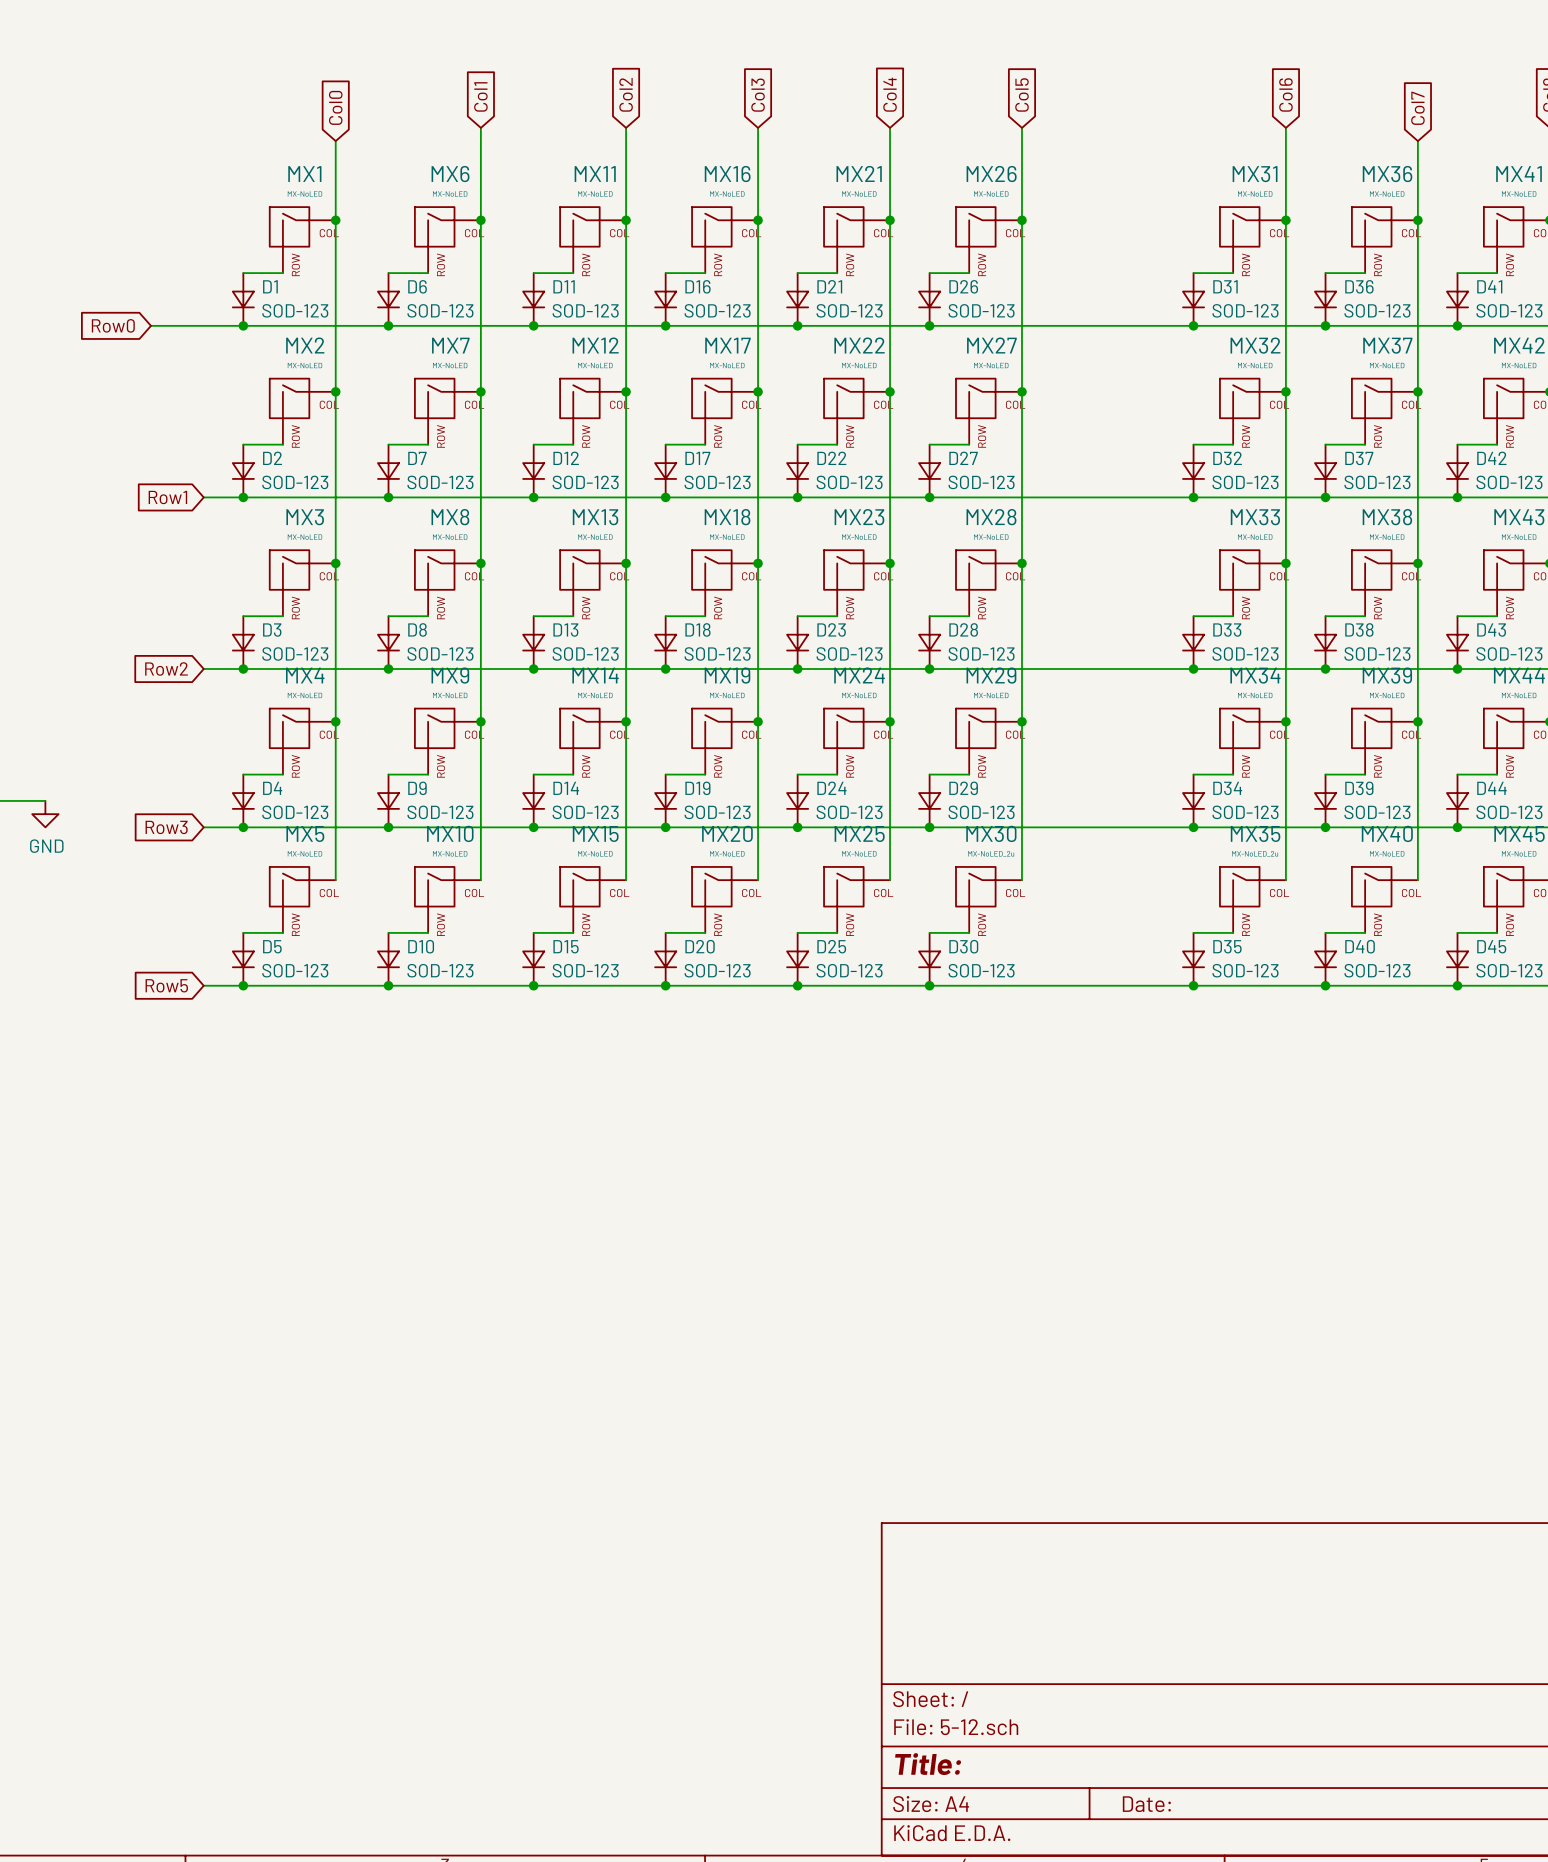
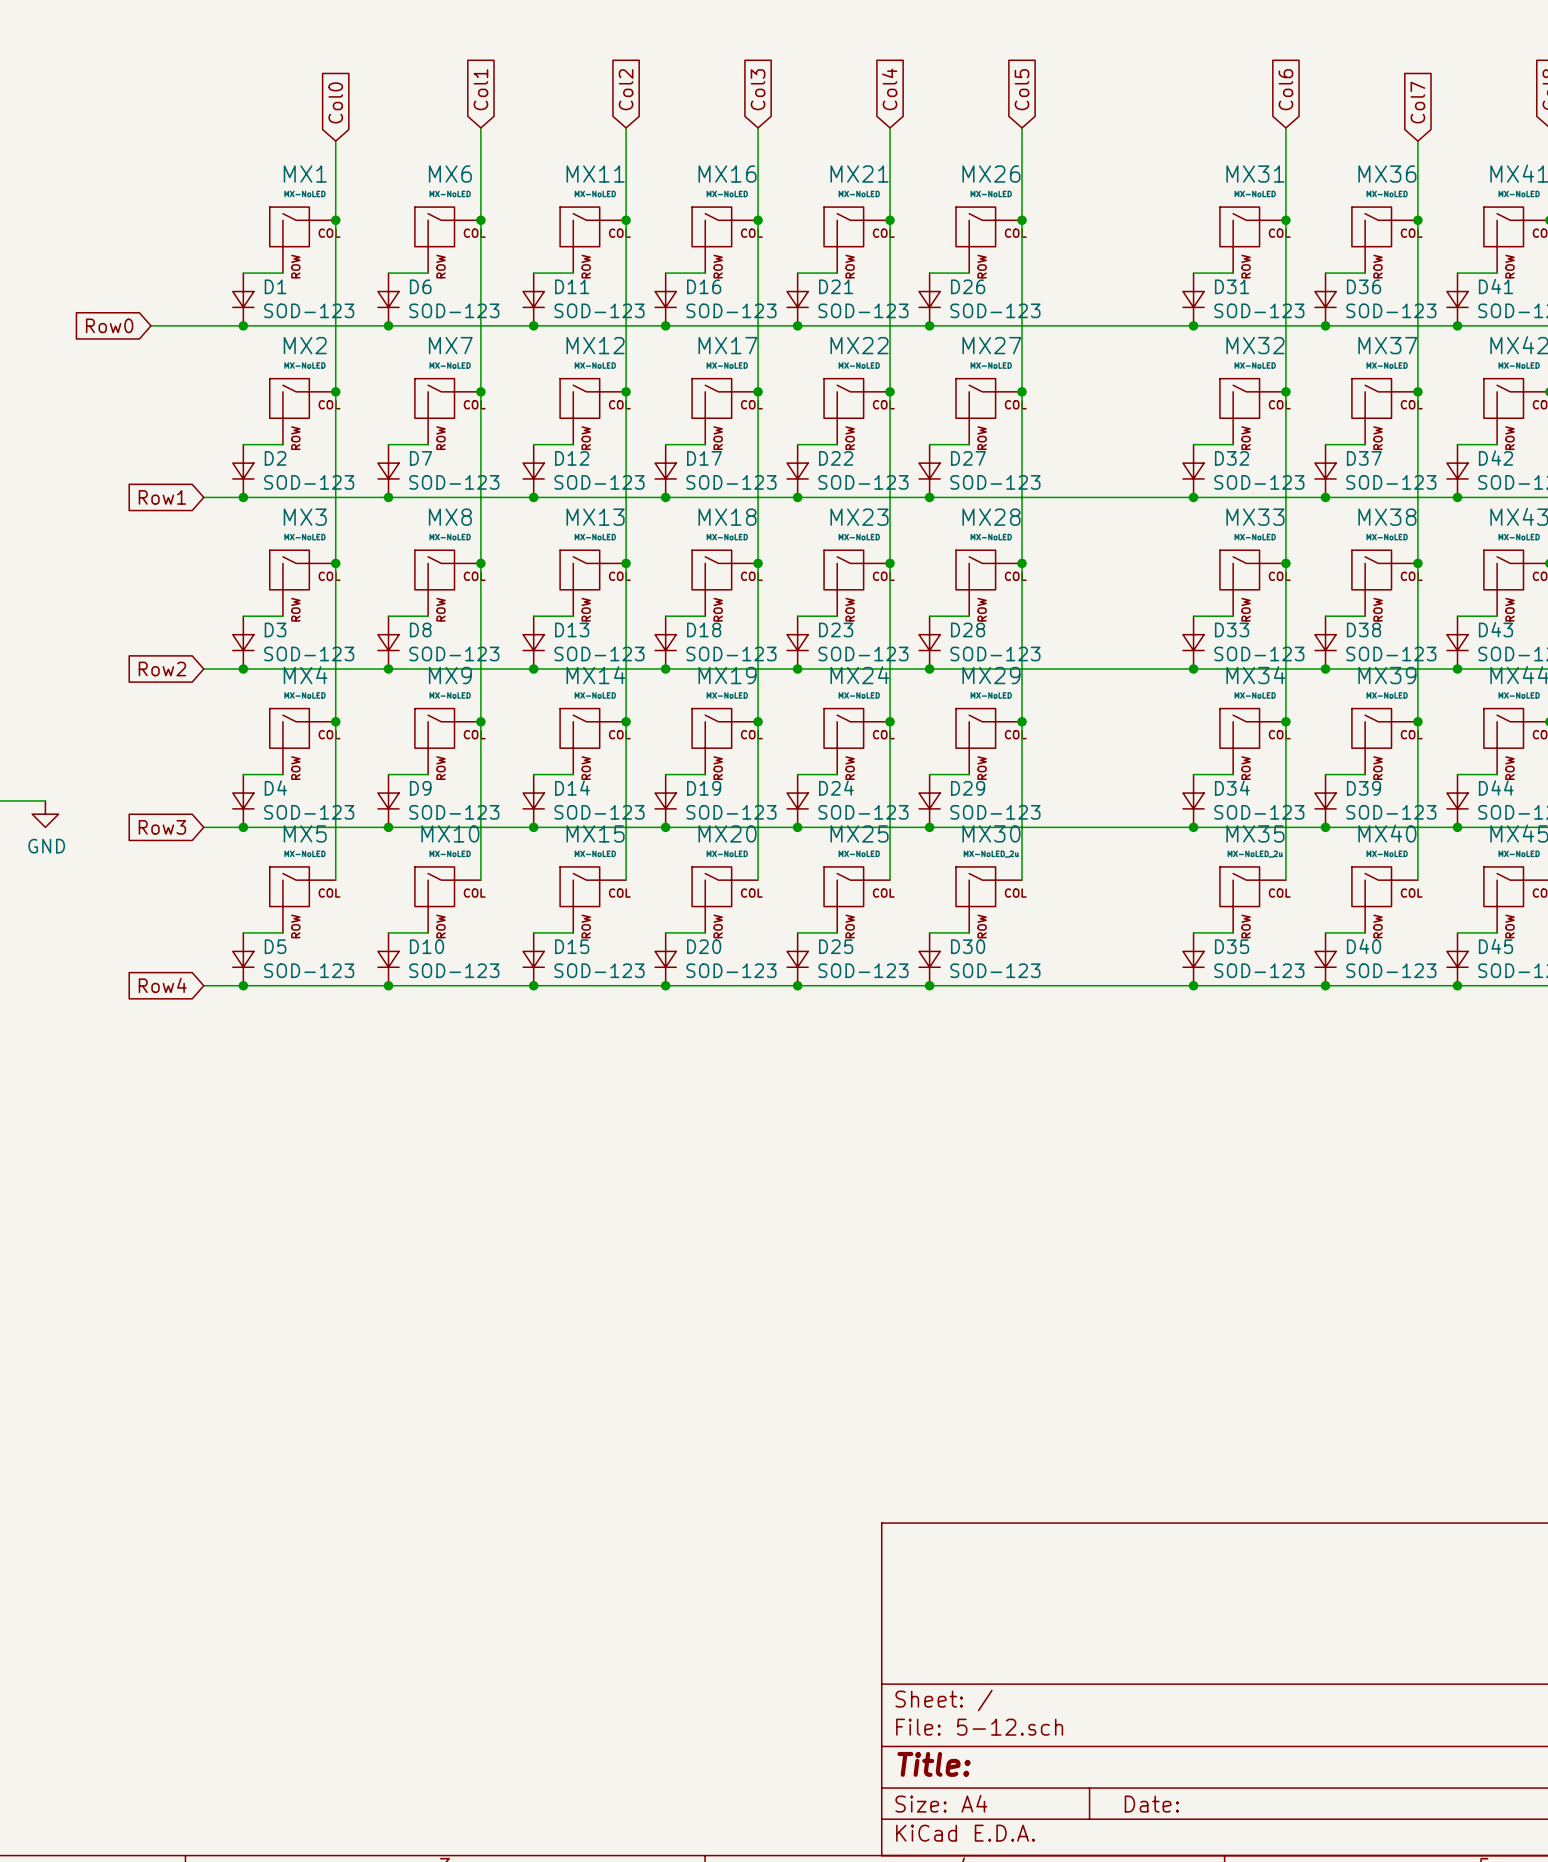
global label: Row5 (166, 985) -> Row4 (162, 985)

